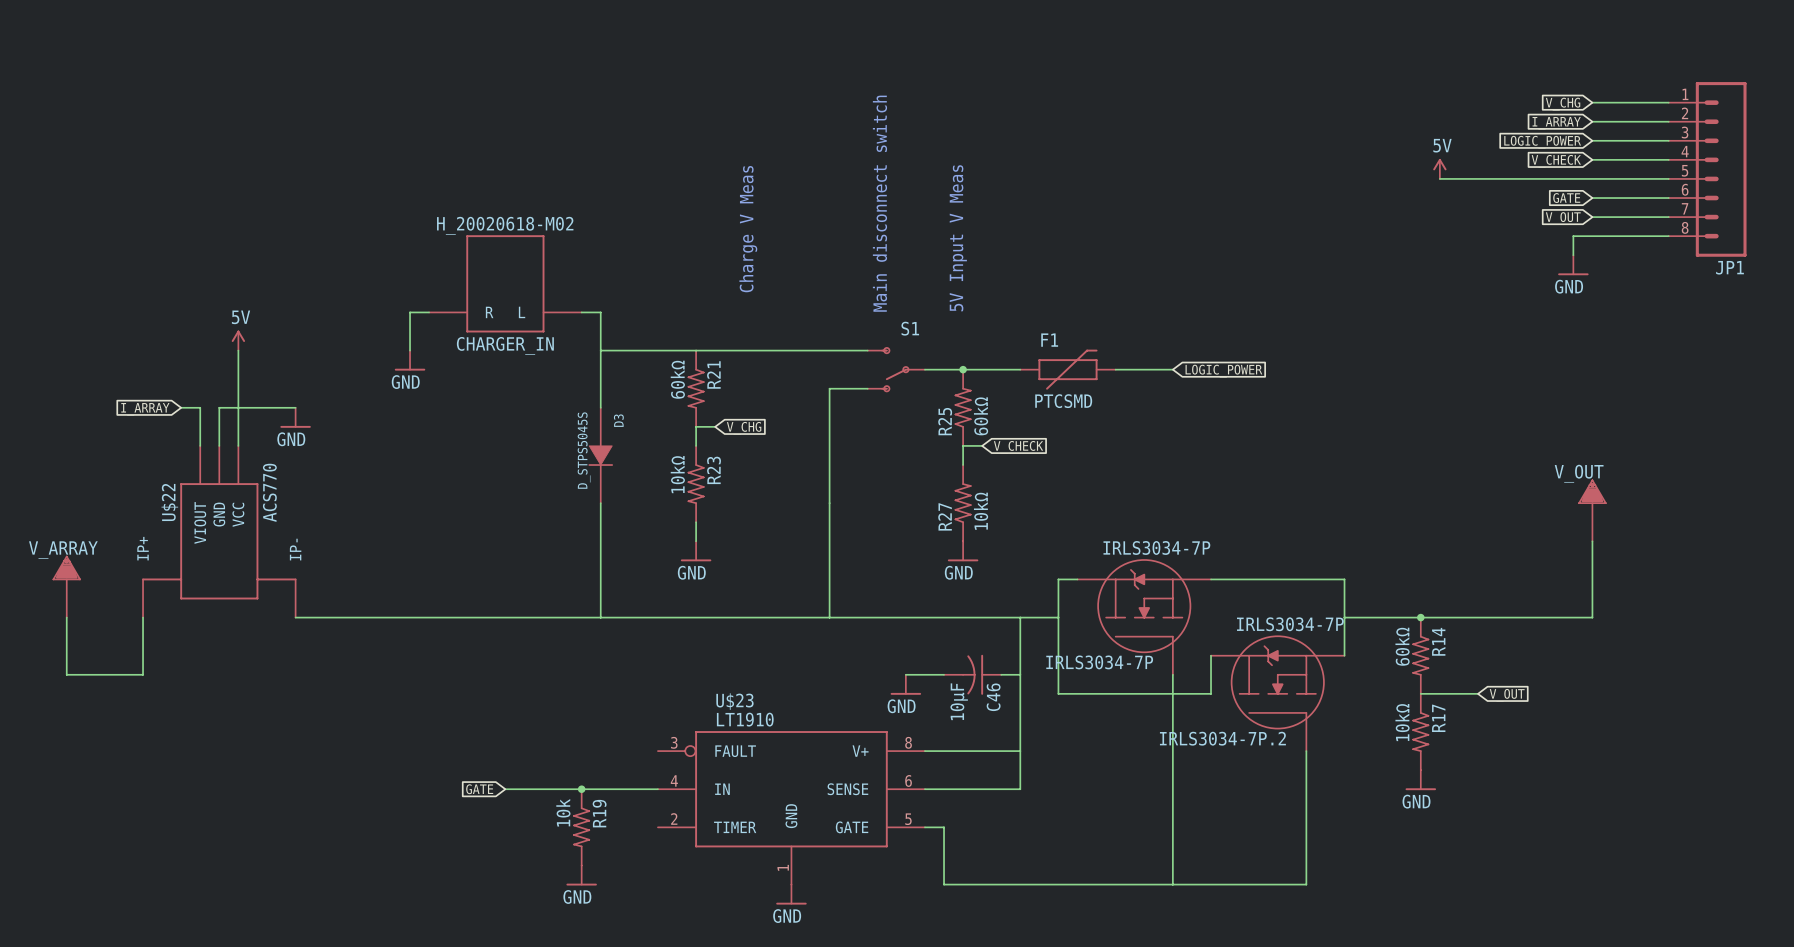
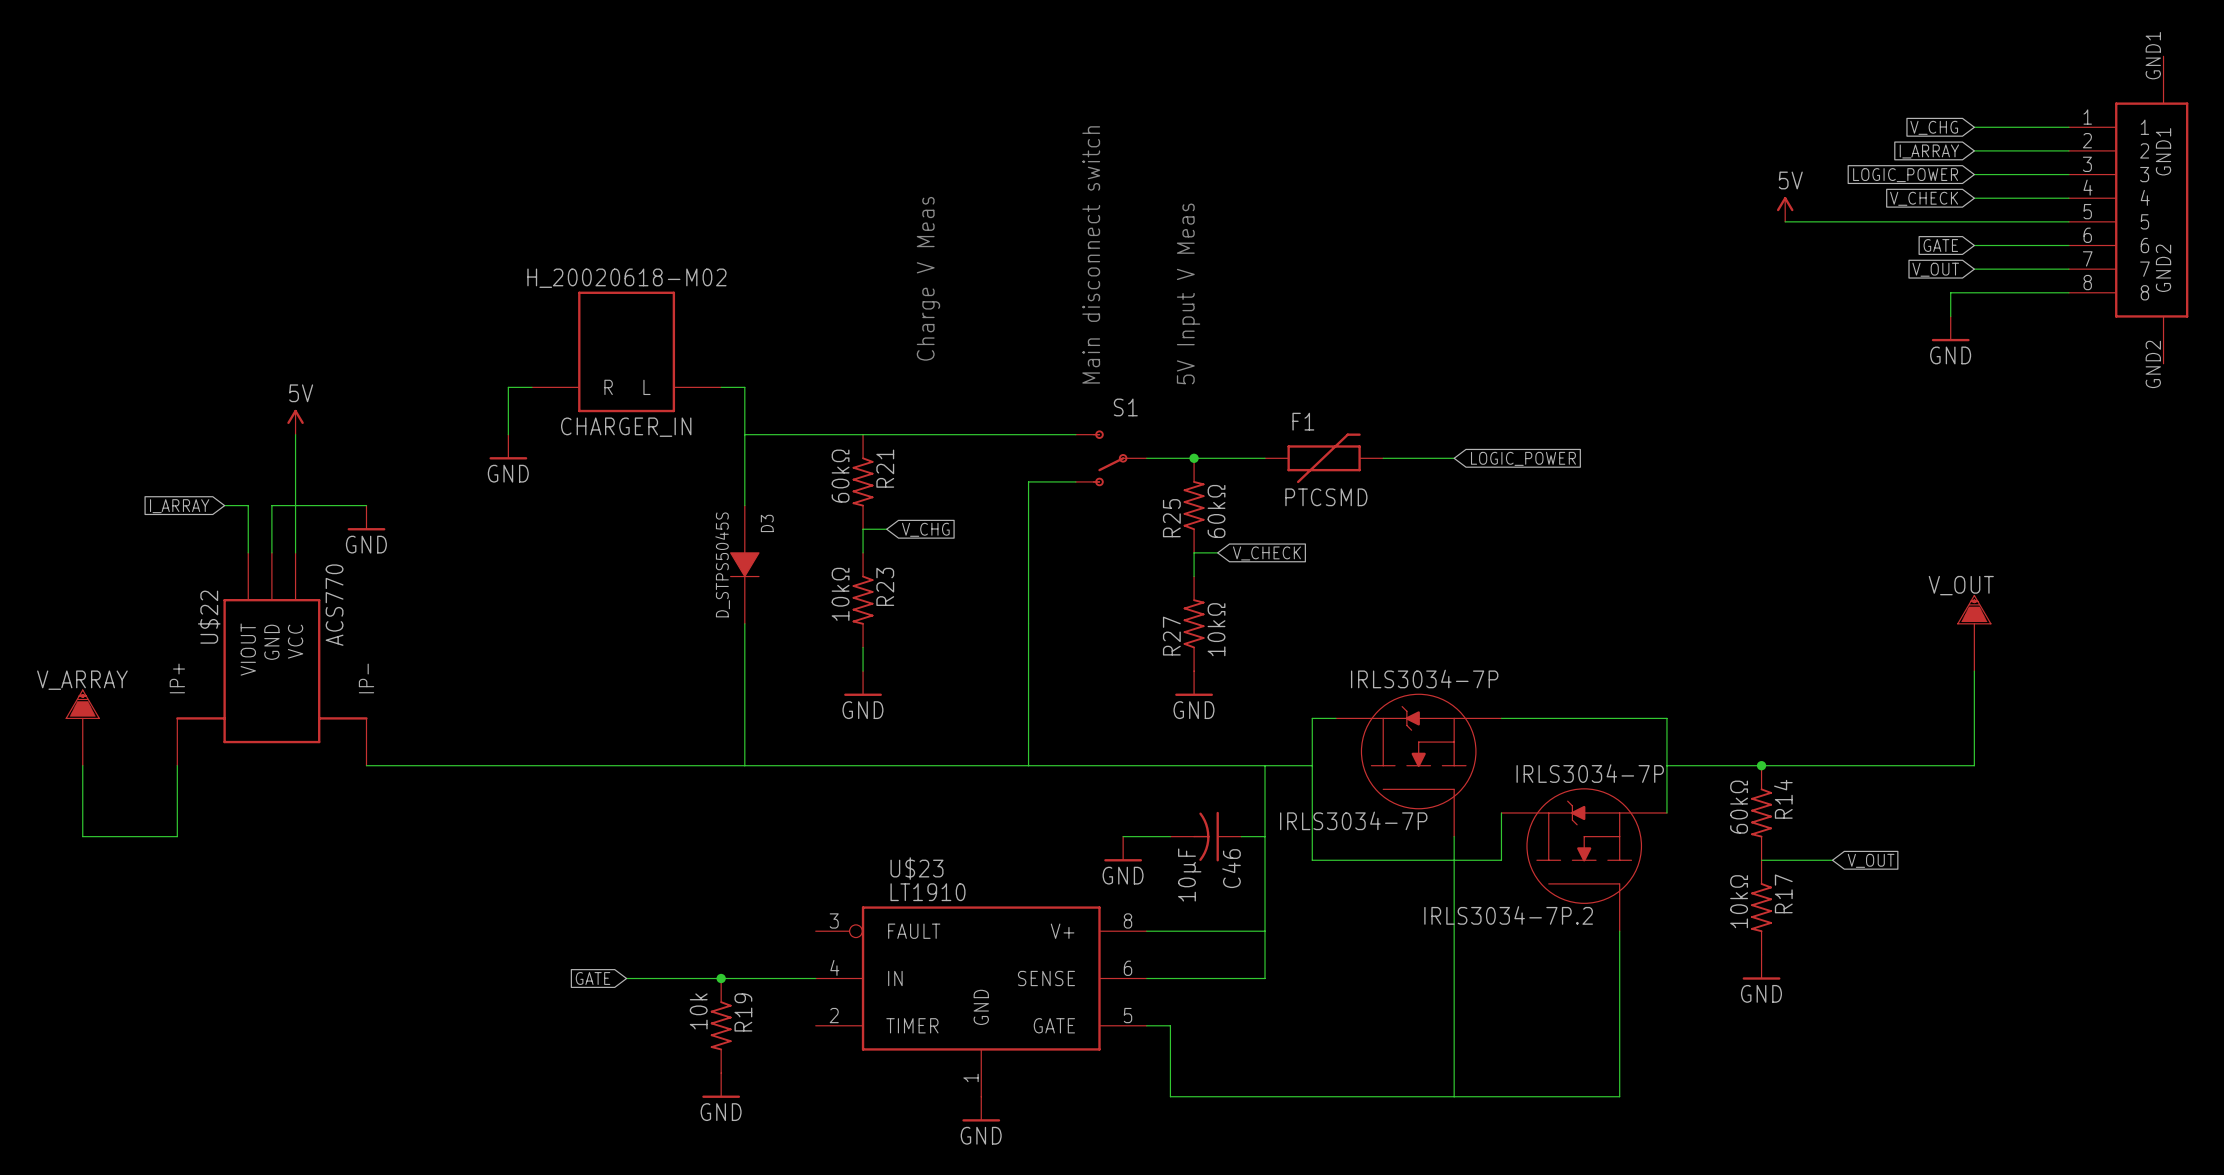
JP1: (1707, 169) -> none
part: none -> (2128, 210)

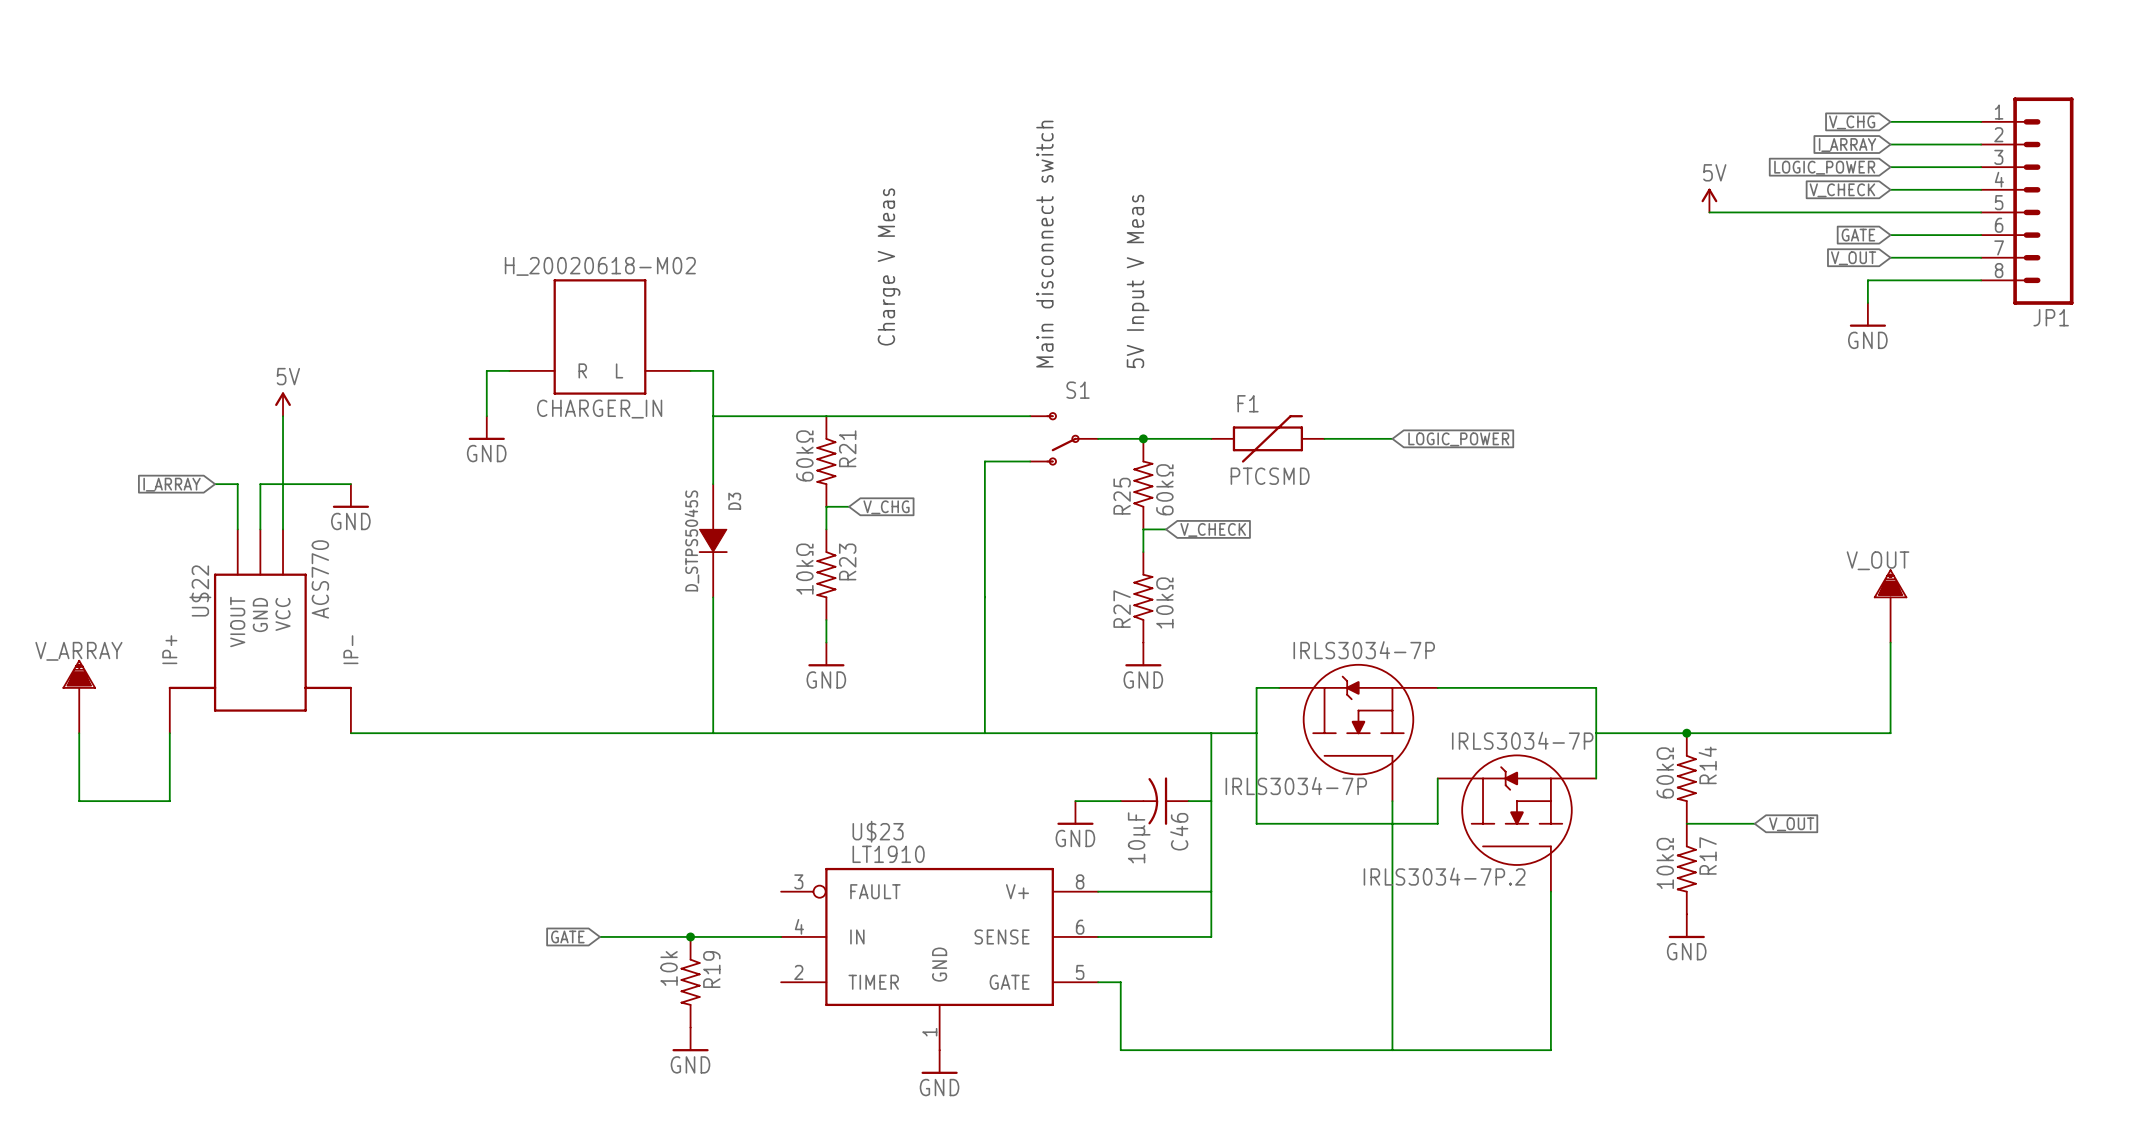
JP1: none -> (2027, 201)
part: (2128, 210) -> none

